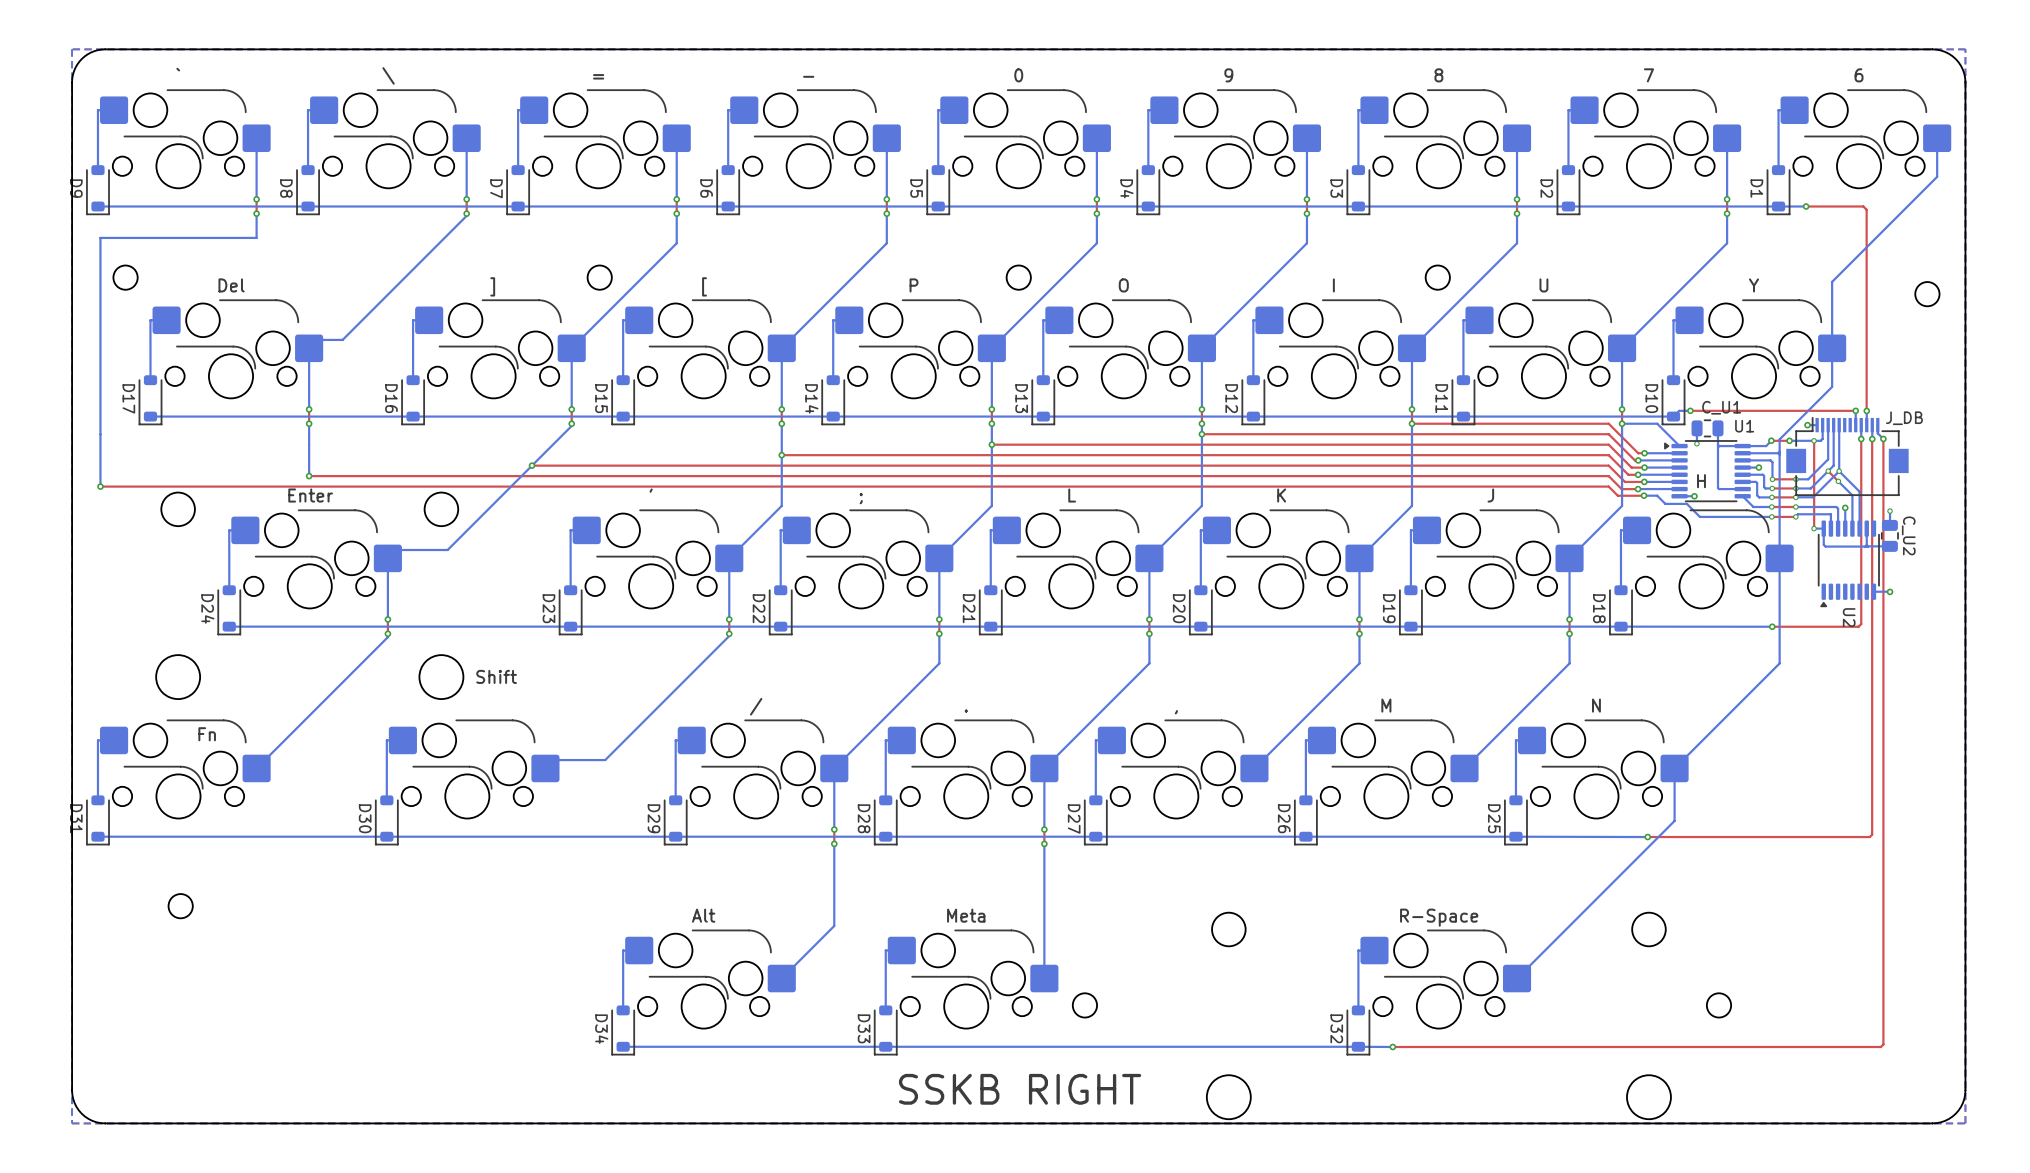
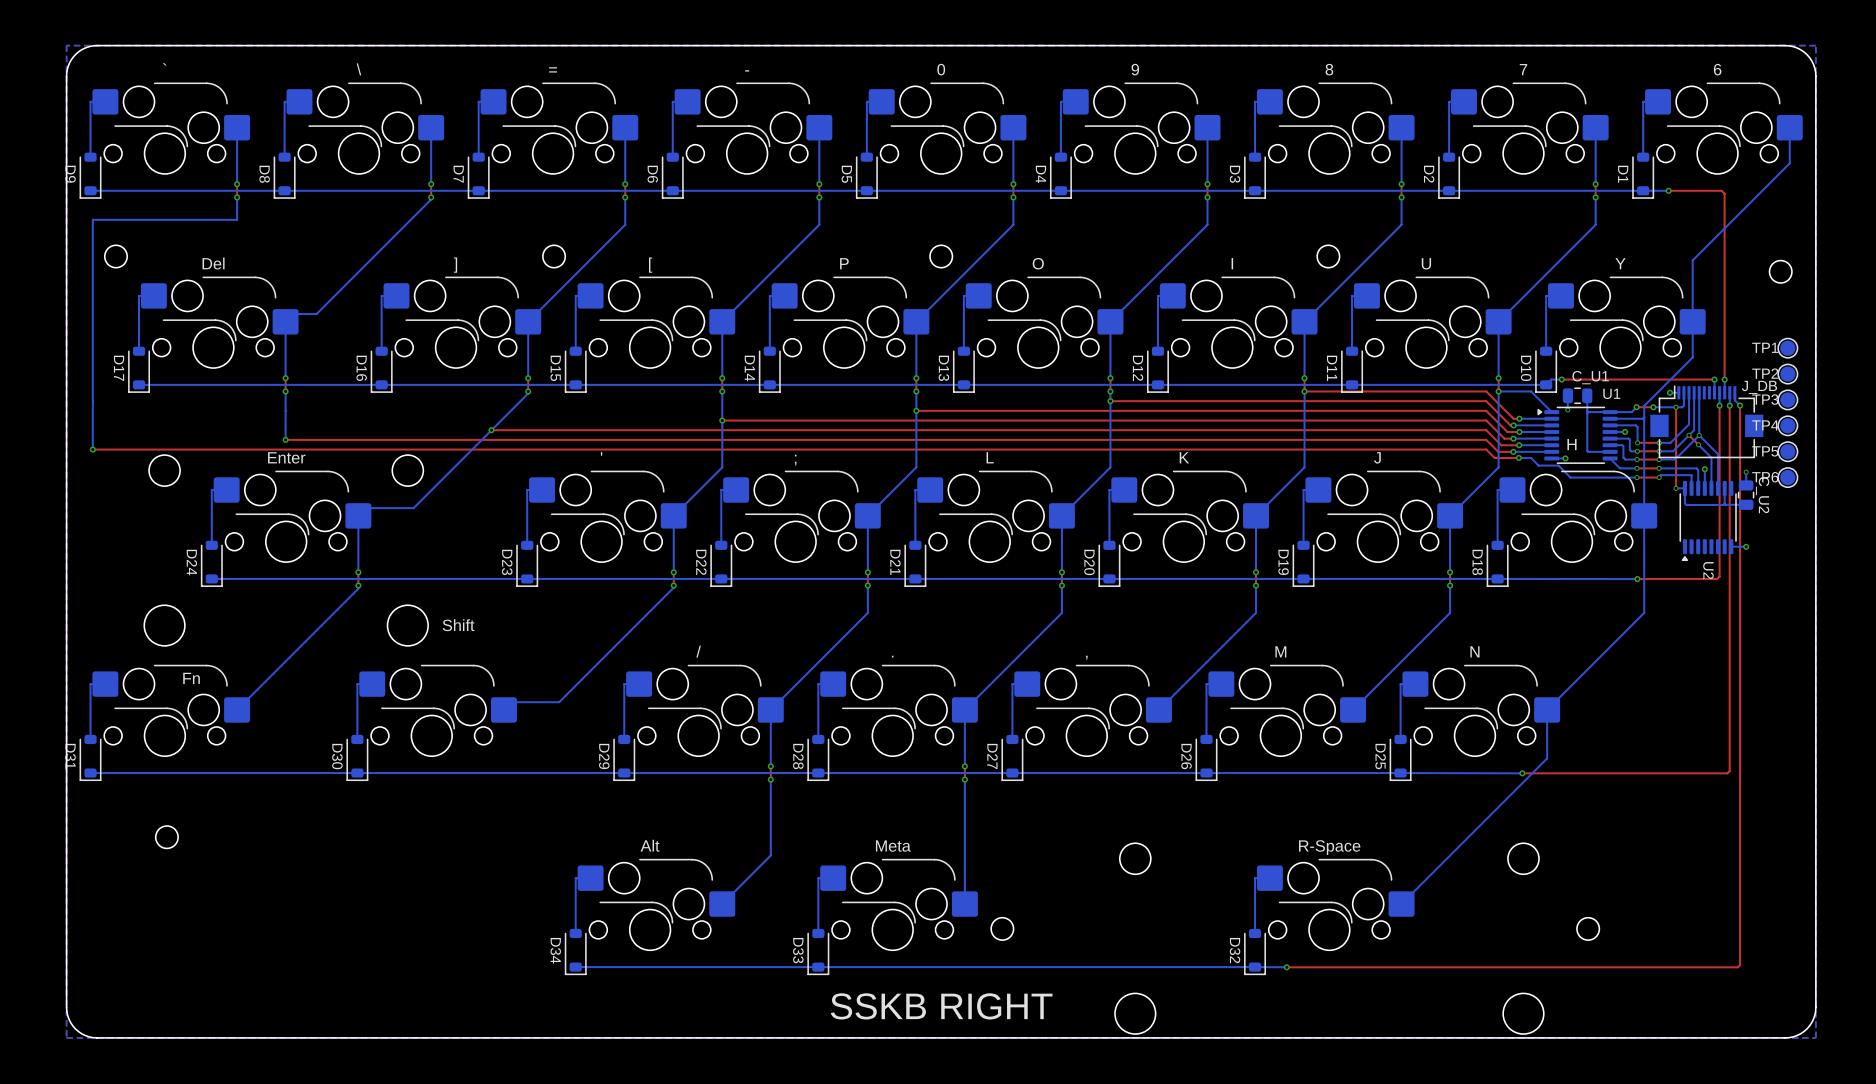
TP1: none -> (1787, 348)
TP2: none -> (1787, 374)
TP3: none -> (1787, 399)
TP4: none -> (1787, 425)
TP5: none -> (1787, 451)
TP6: none -> (1787, 477)

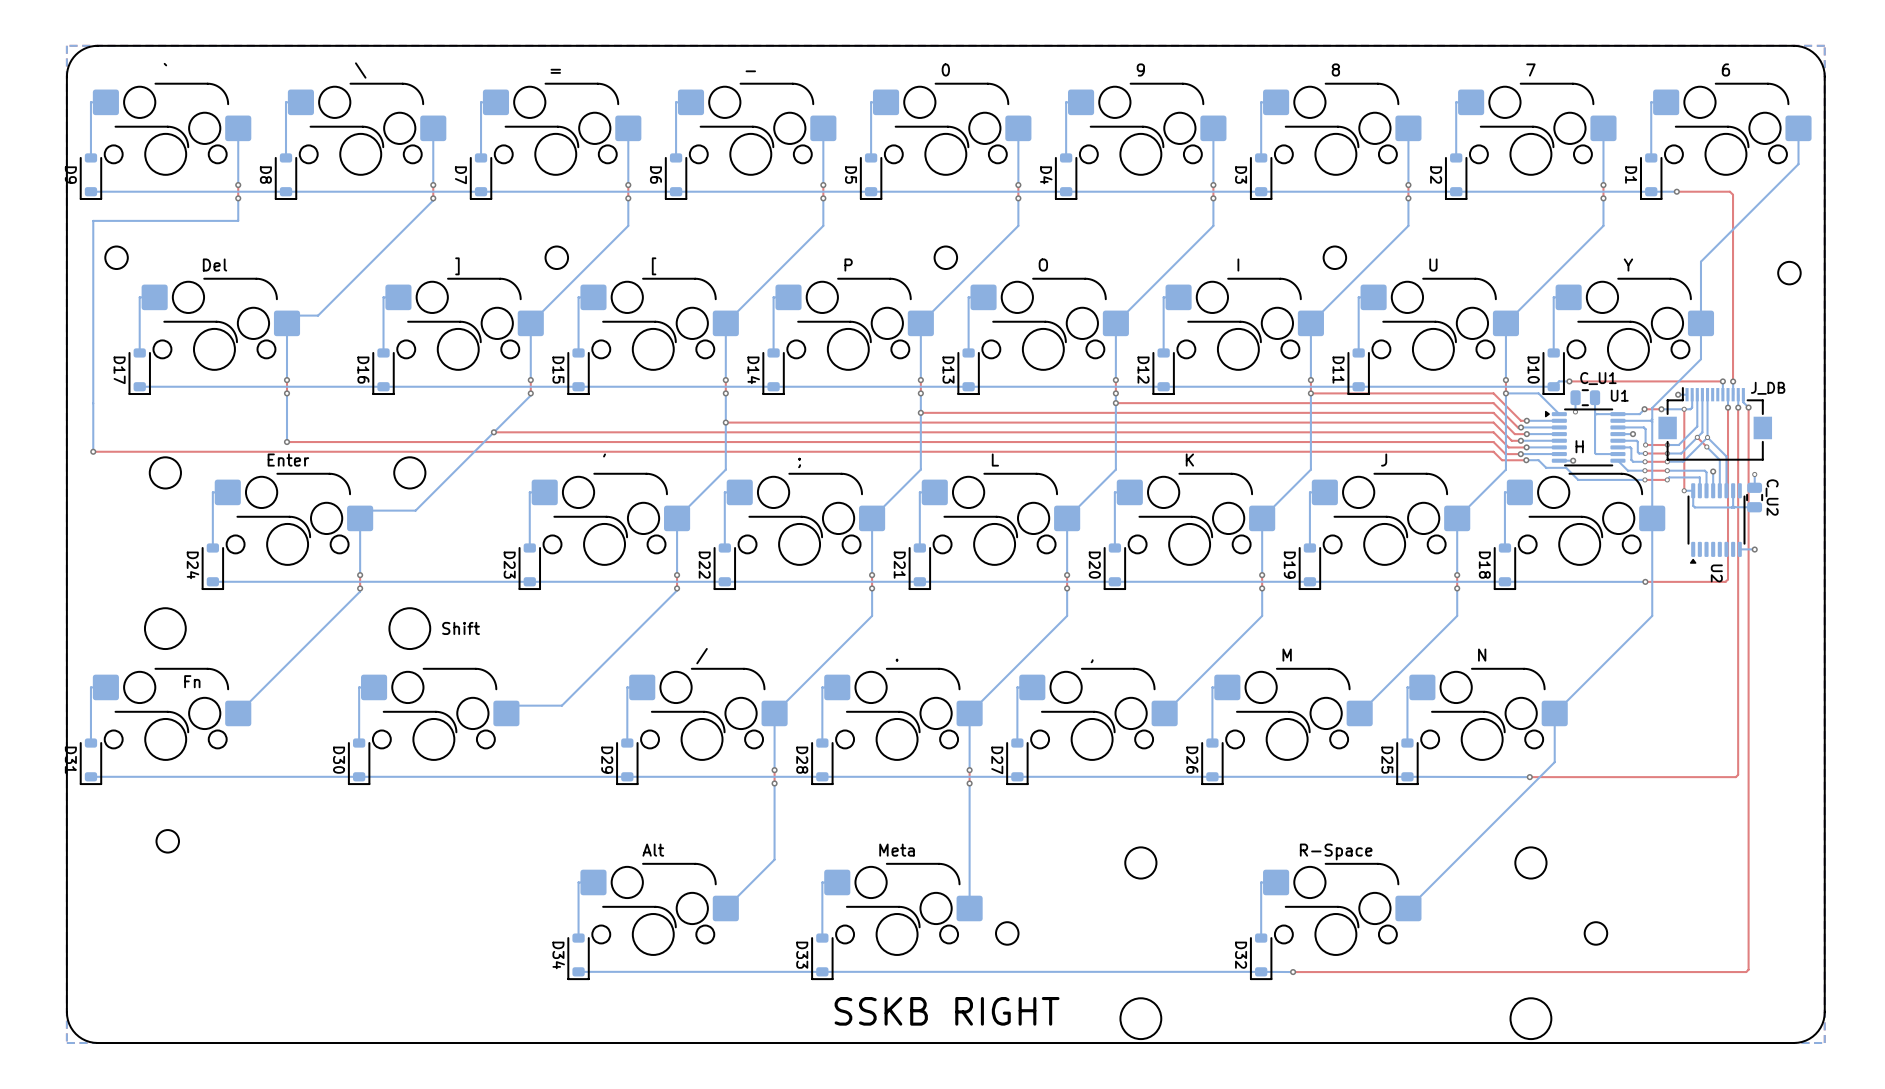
TP1: (1787, 348) -> none
TP2: (1787, 374) -> none
TP3: (1787, 399) -> none
TP4: (1787, 425) -> none
TP5: (1787, 451) -> none
TP6: (1787, 477) -> none

